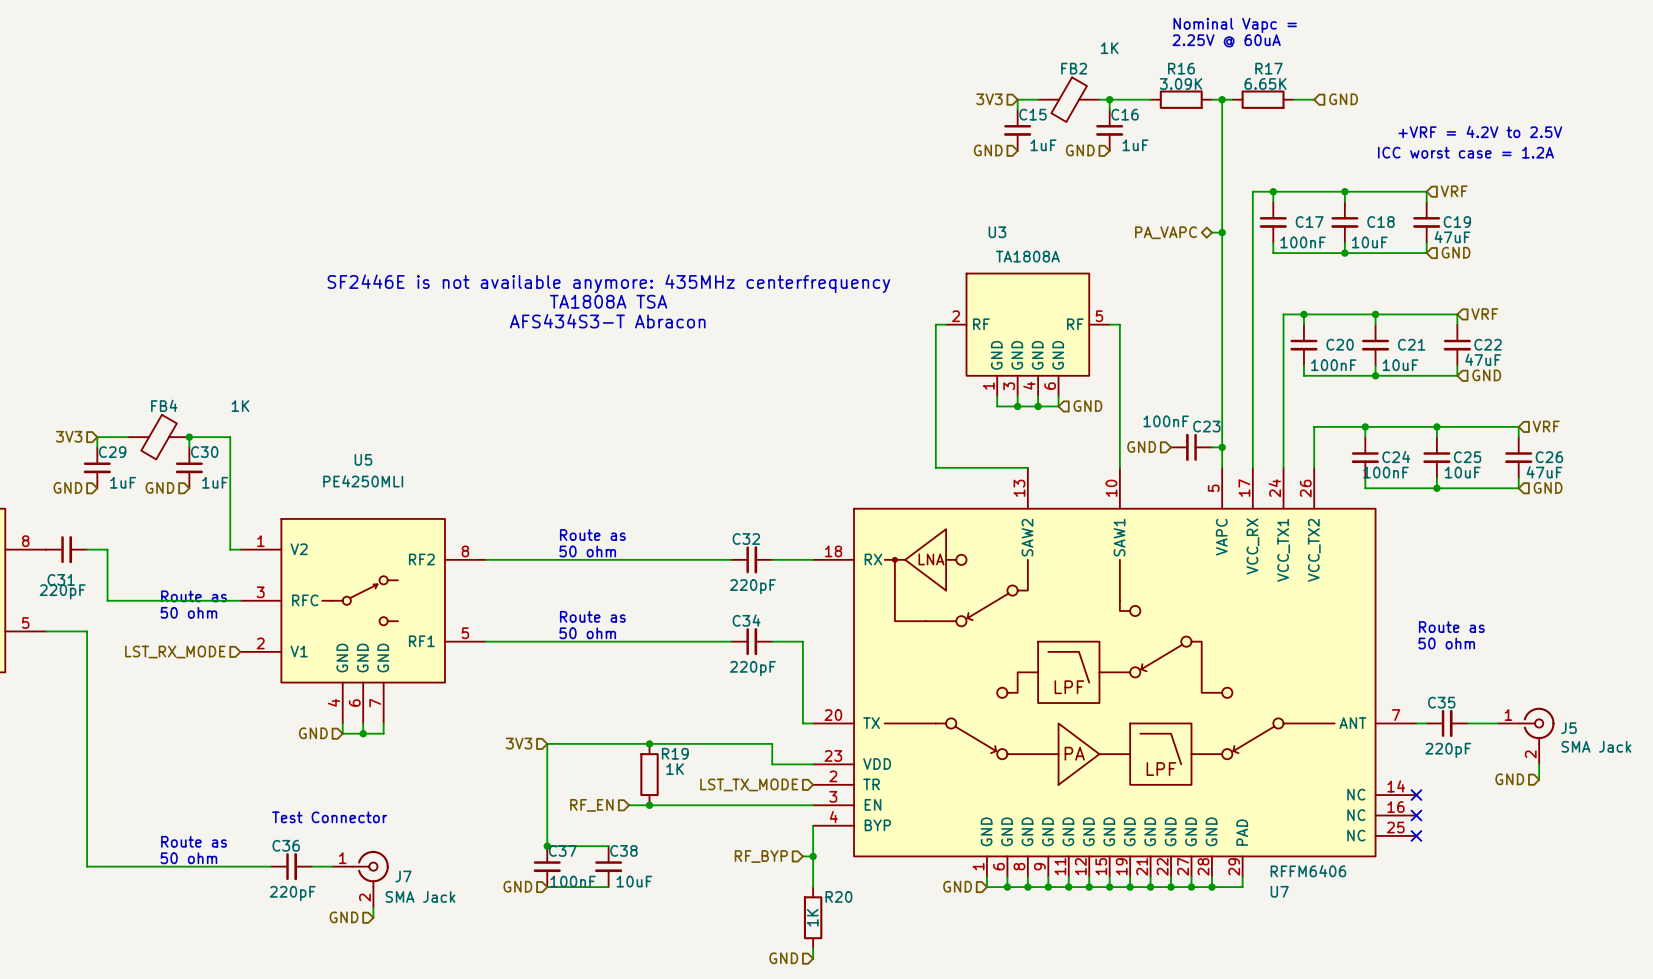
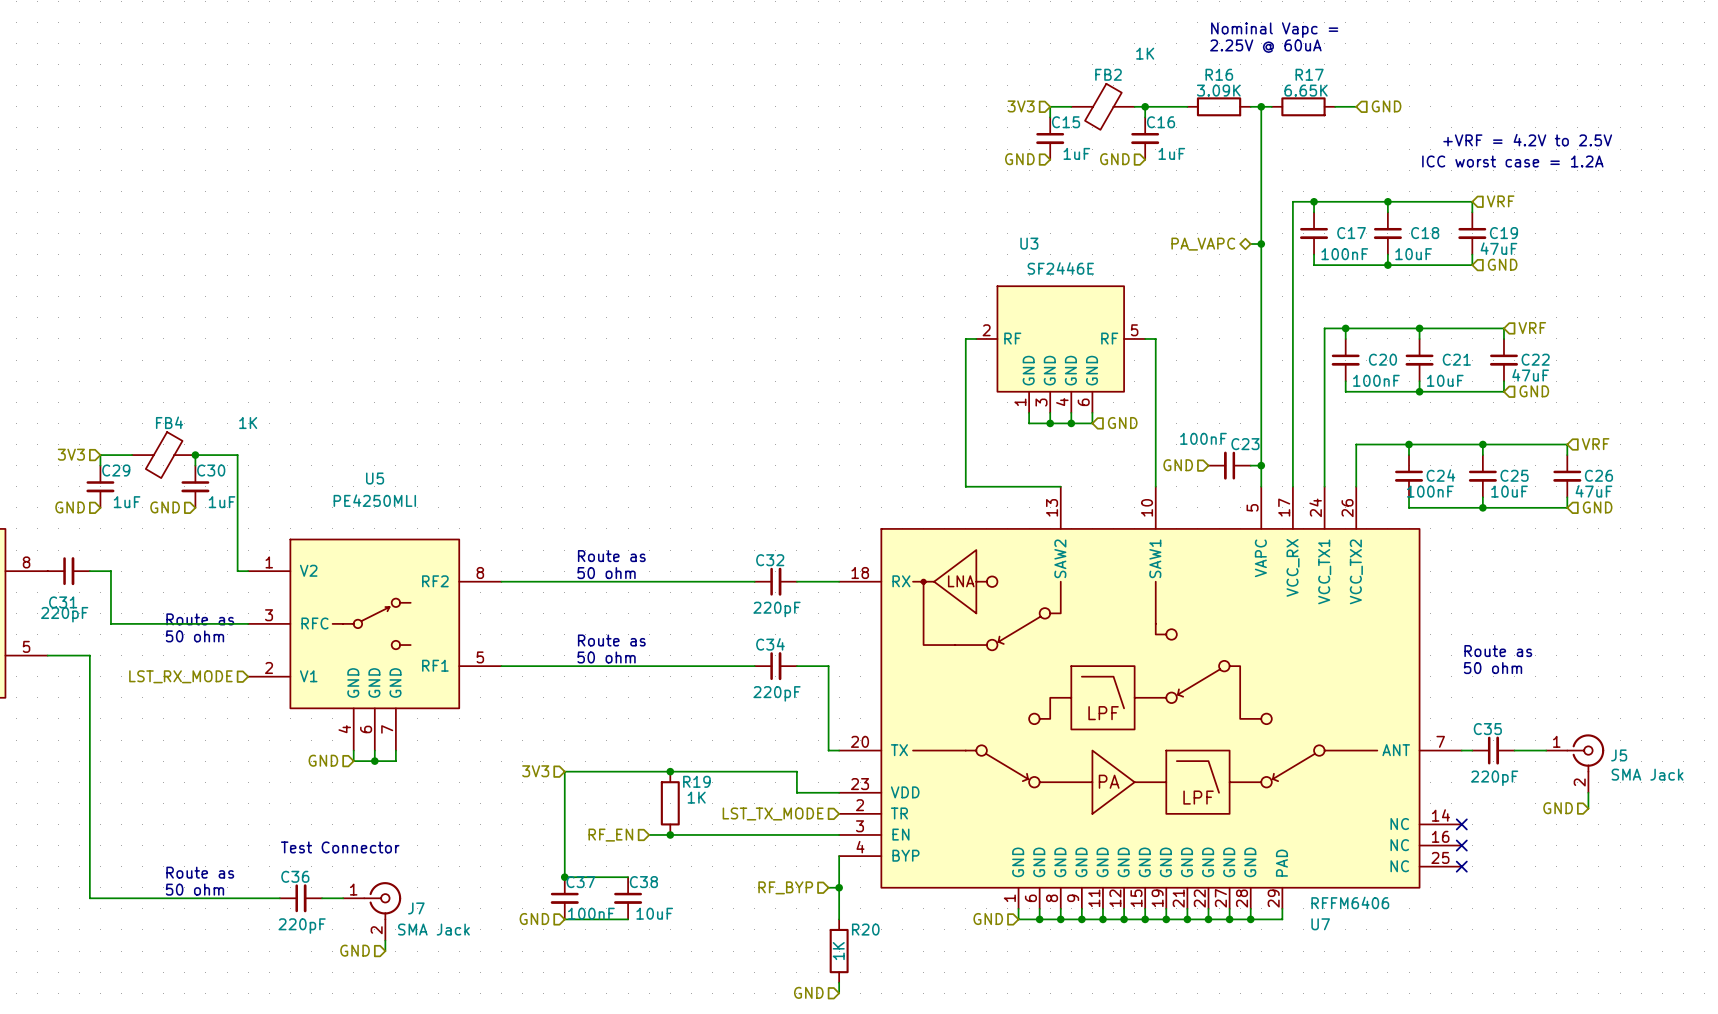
U3 value: TA1808A (1027, 256) -> SF2446E (1060, 268)
text: SF2446E is not available anymore: 435MHz centerfrequency (608, 283) -> none
text: TA1808A TSA (608, 301) -> none
text: AFS434S3-T Abracon (607, 321) -> none

